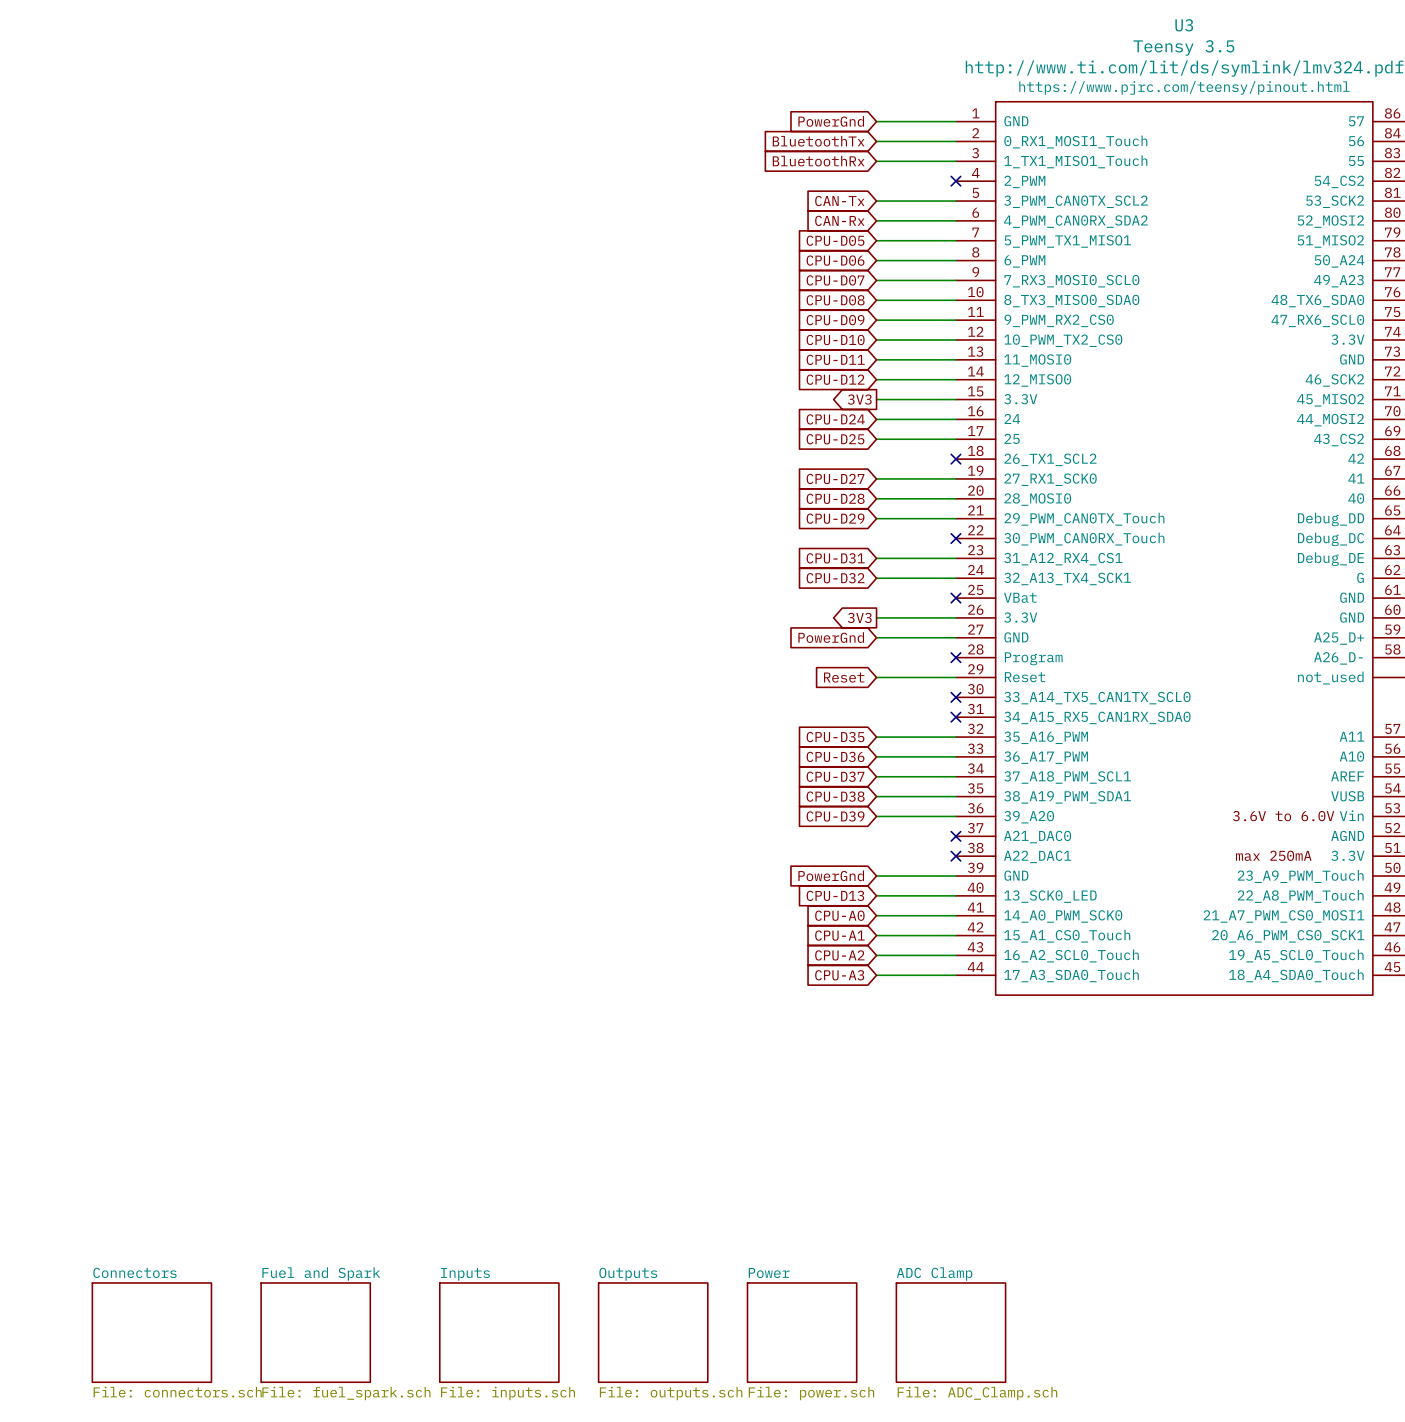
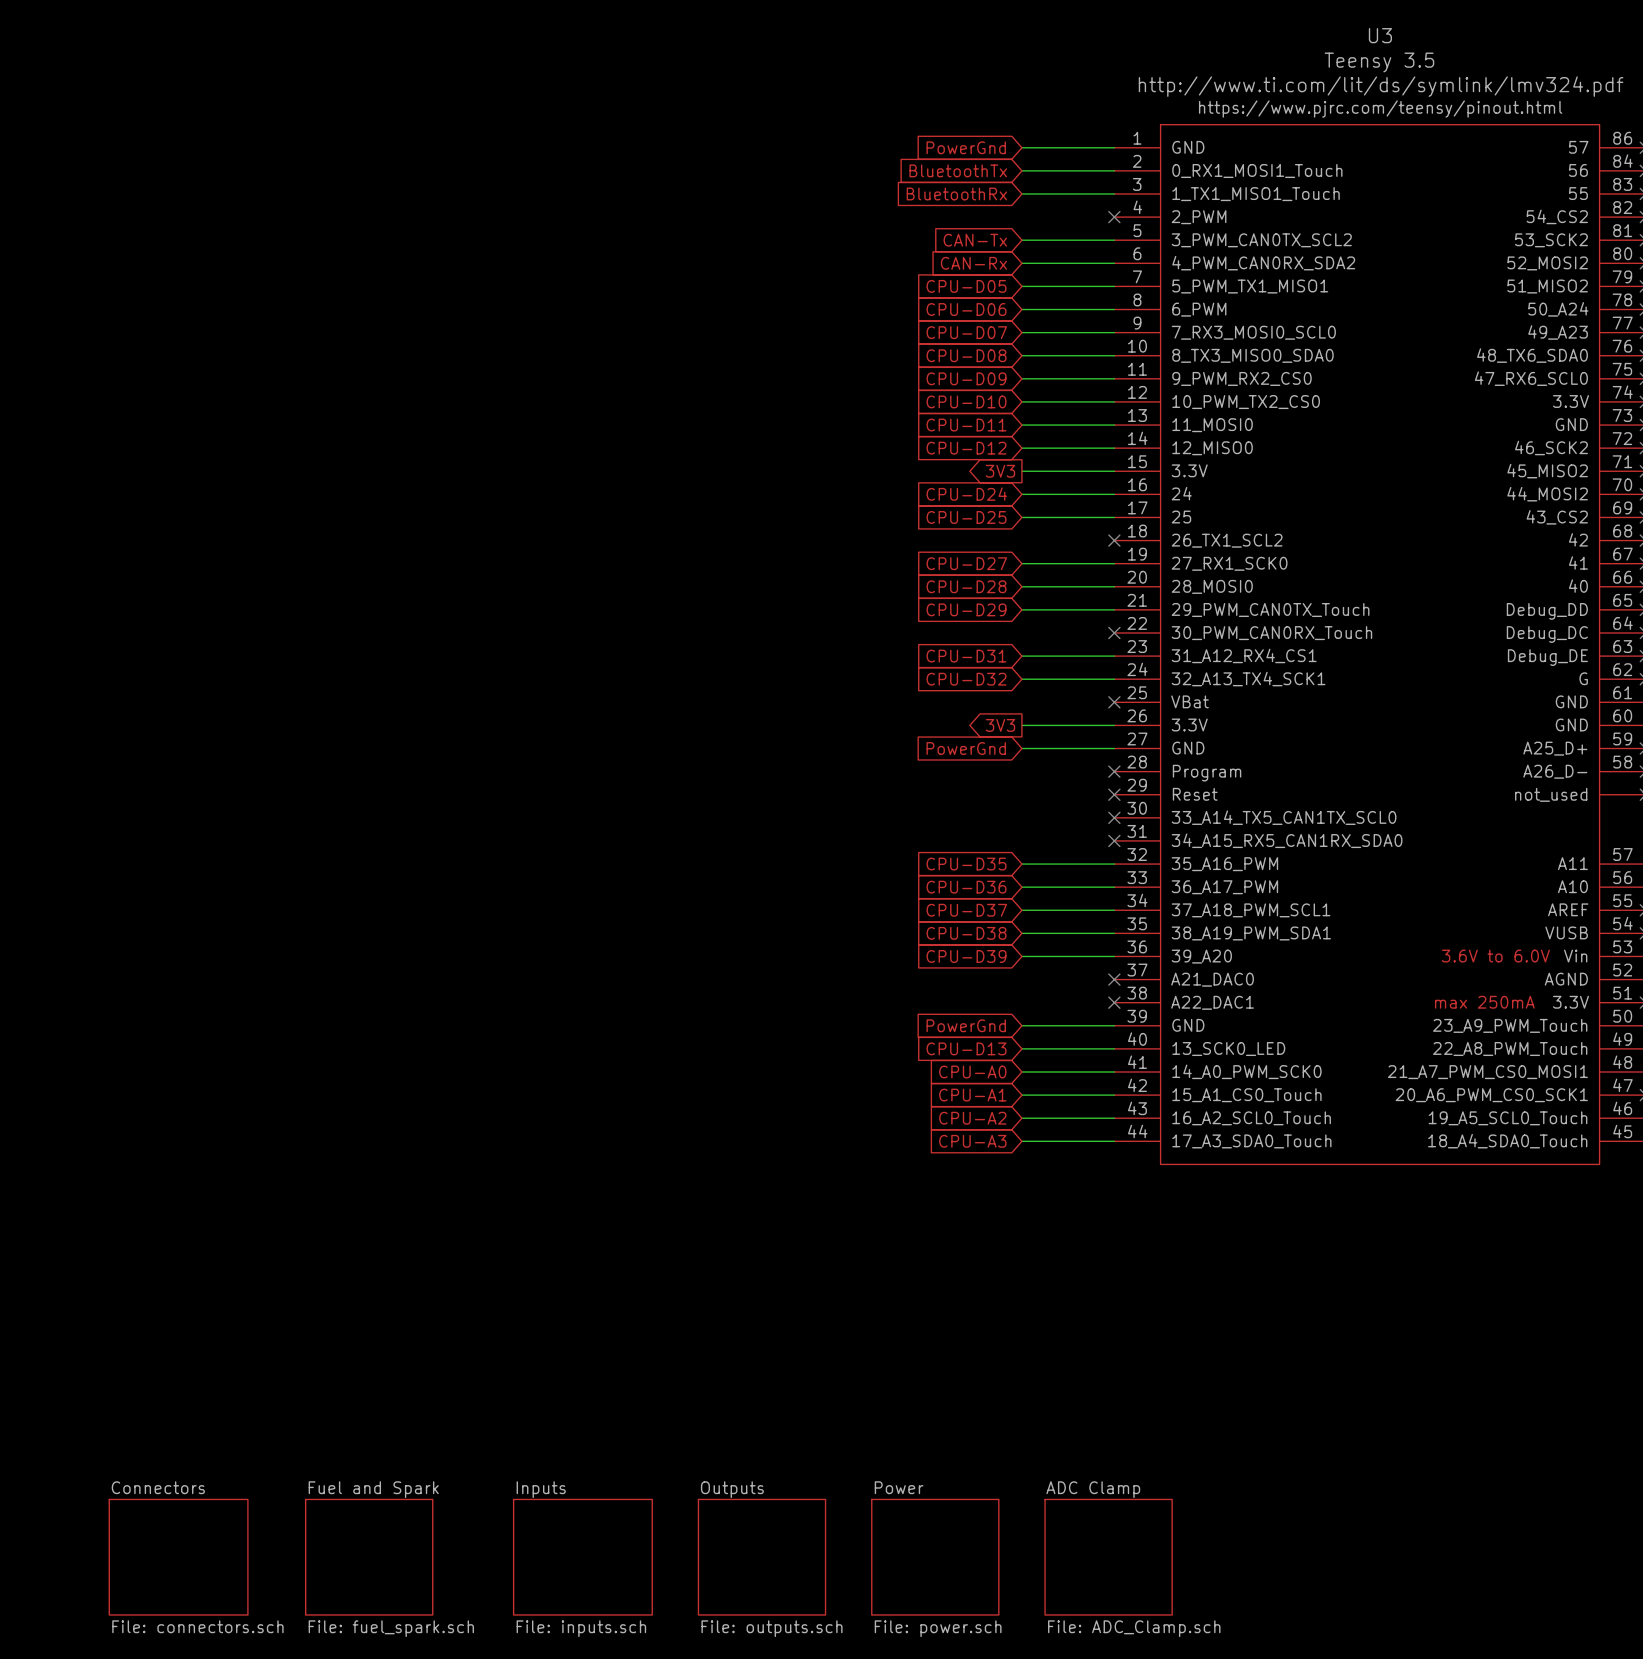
global label: Reset (844, 677) -> none
wire: (876, 677) (955, 677) -> none
no-connect mark: none -> (1114, 794)

